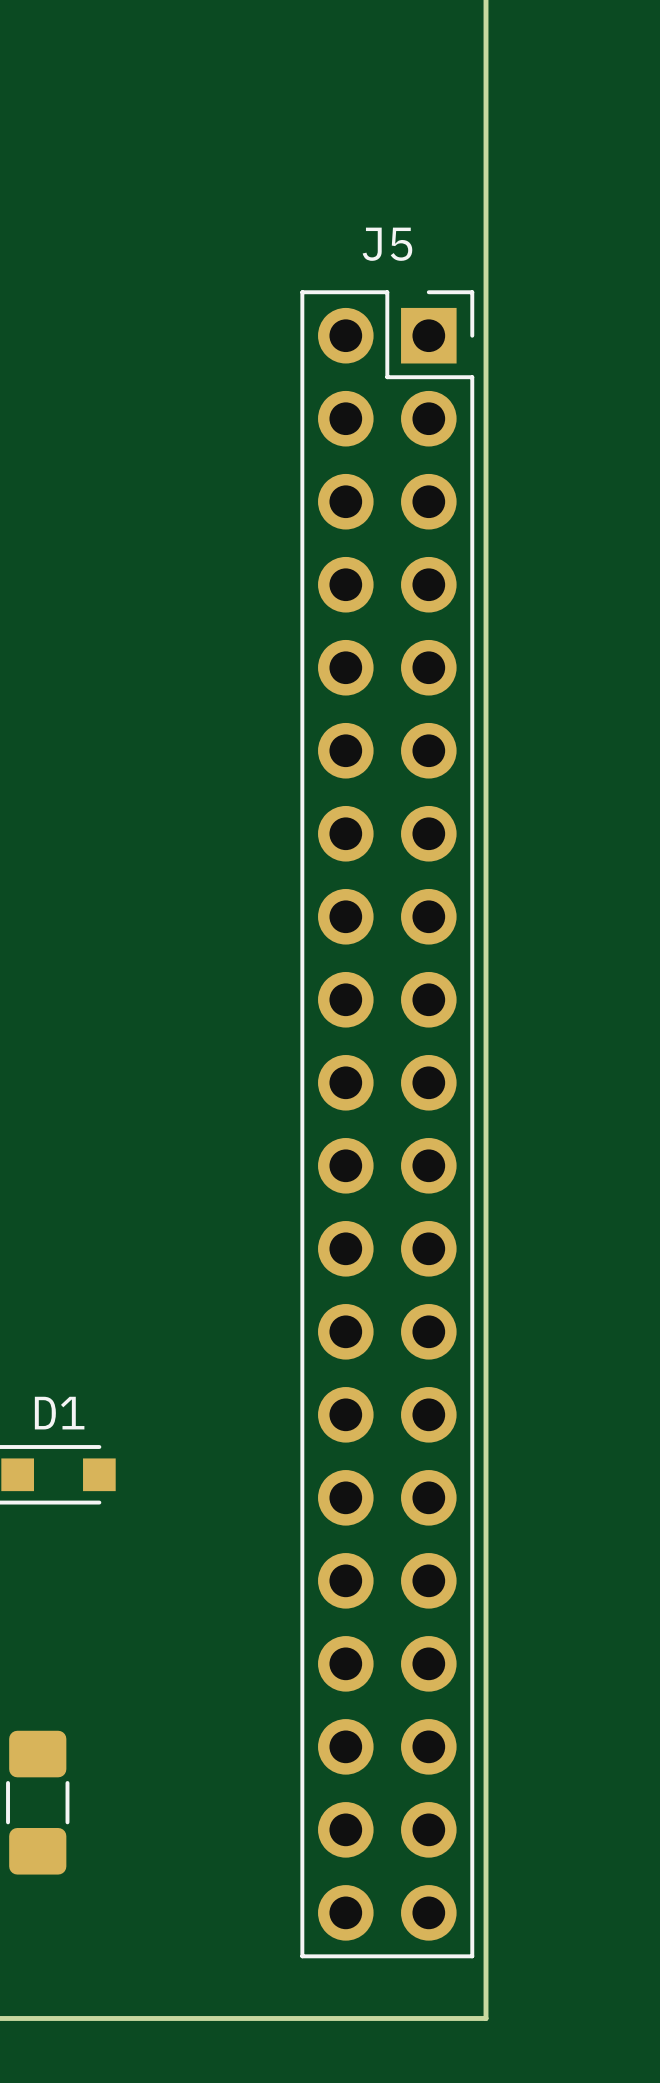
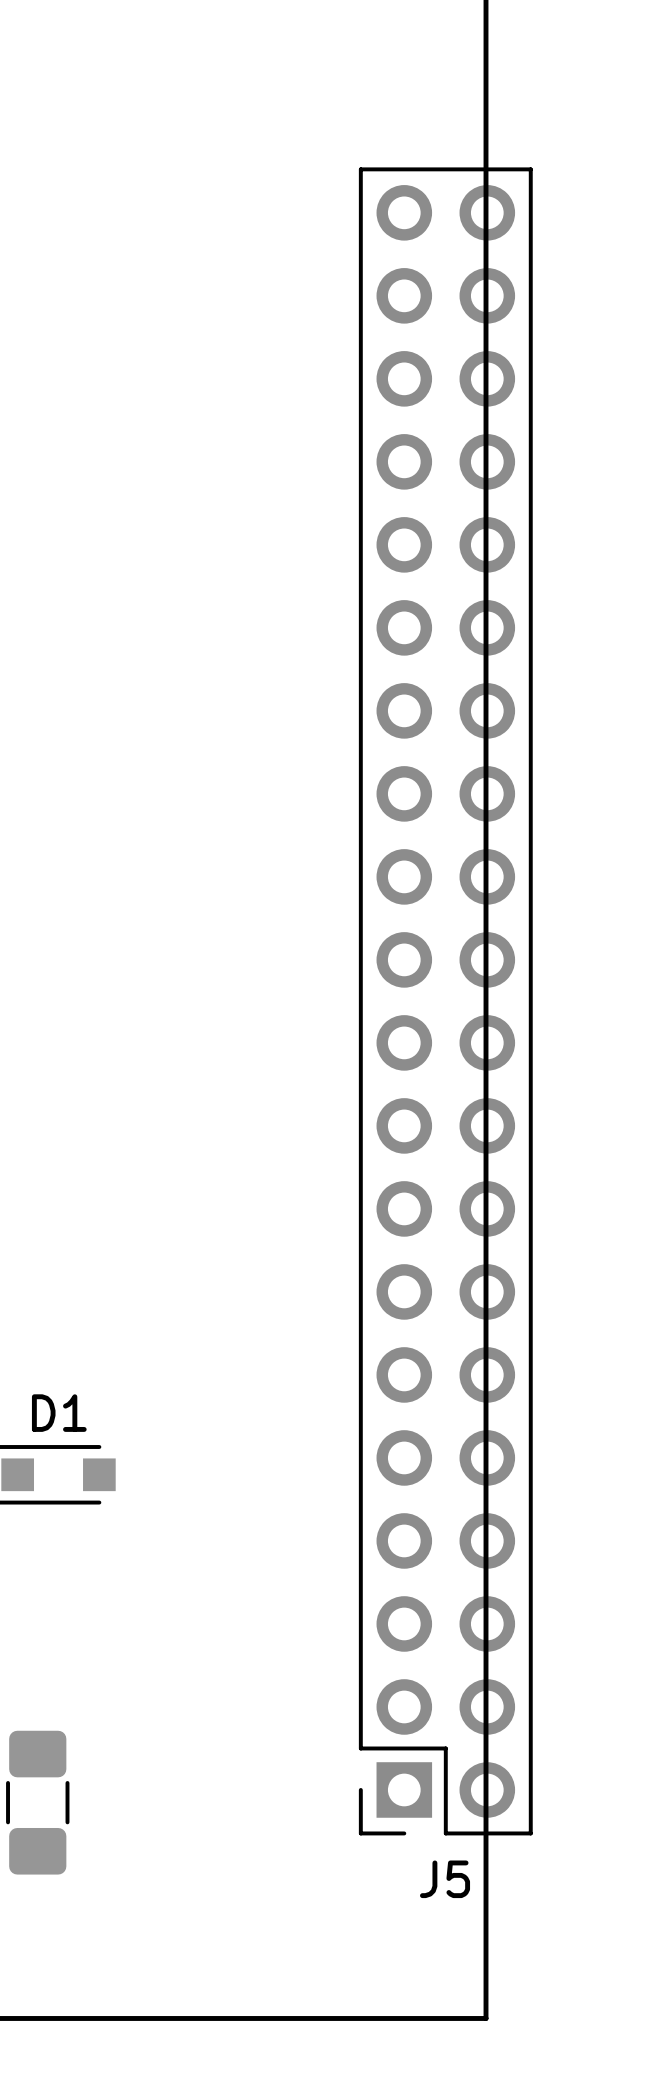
J5 rotation: 0° (387, 1124) -> 180° (445, 1001)

